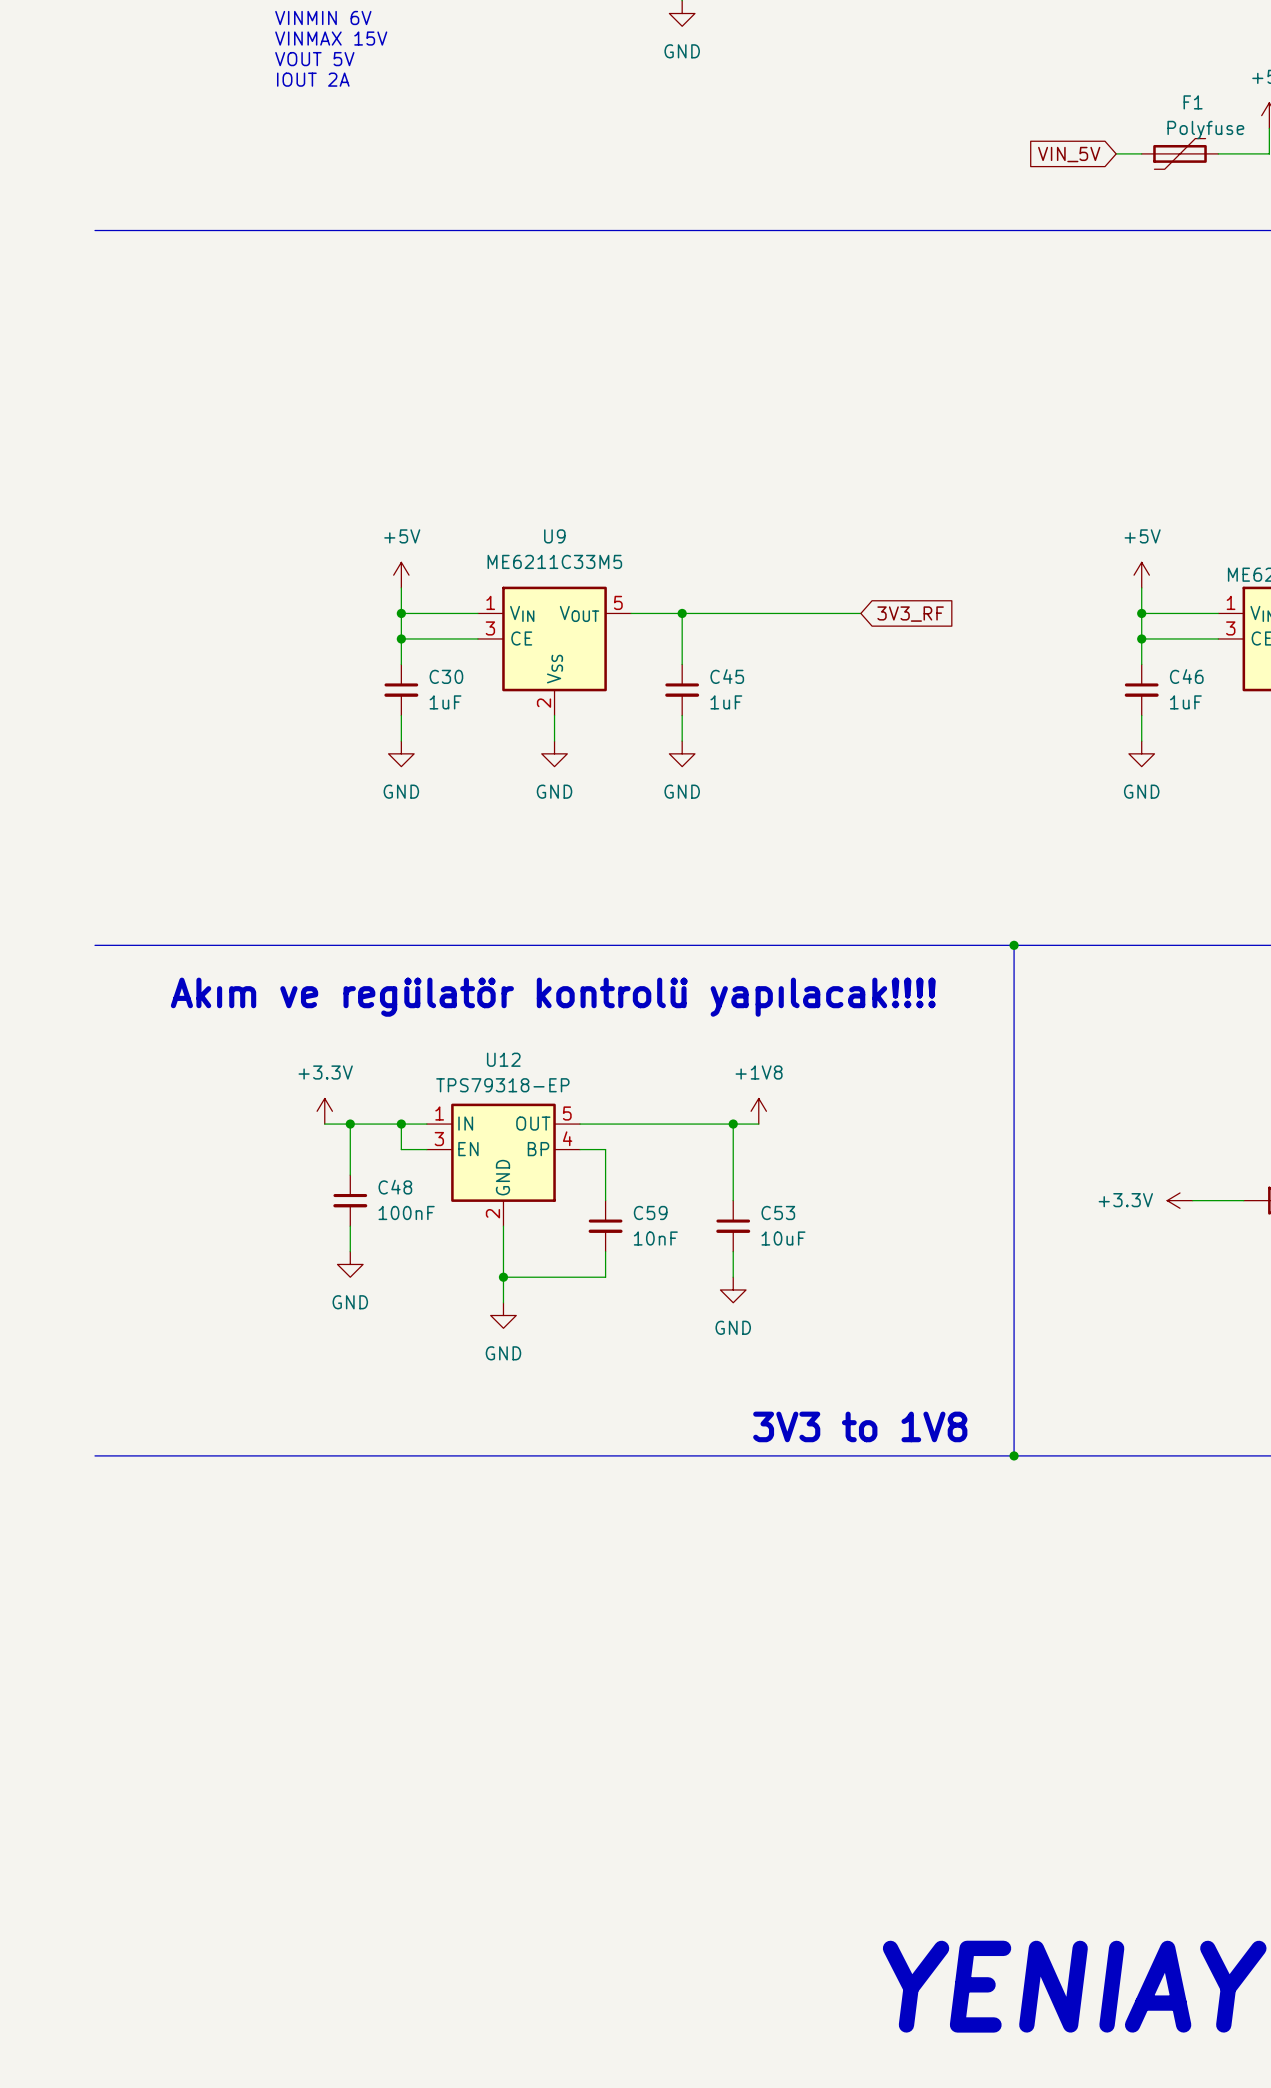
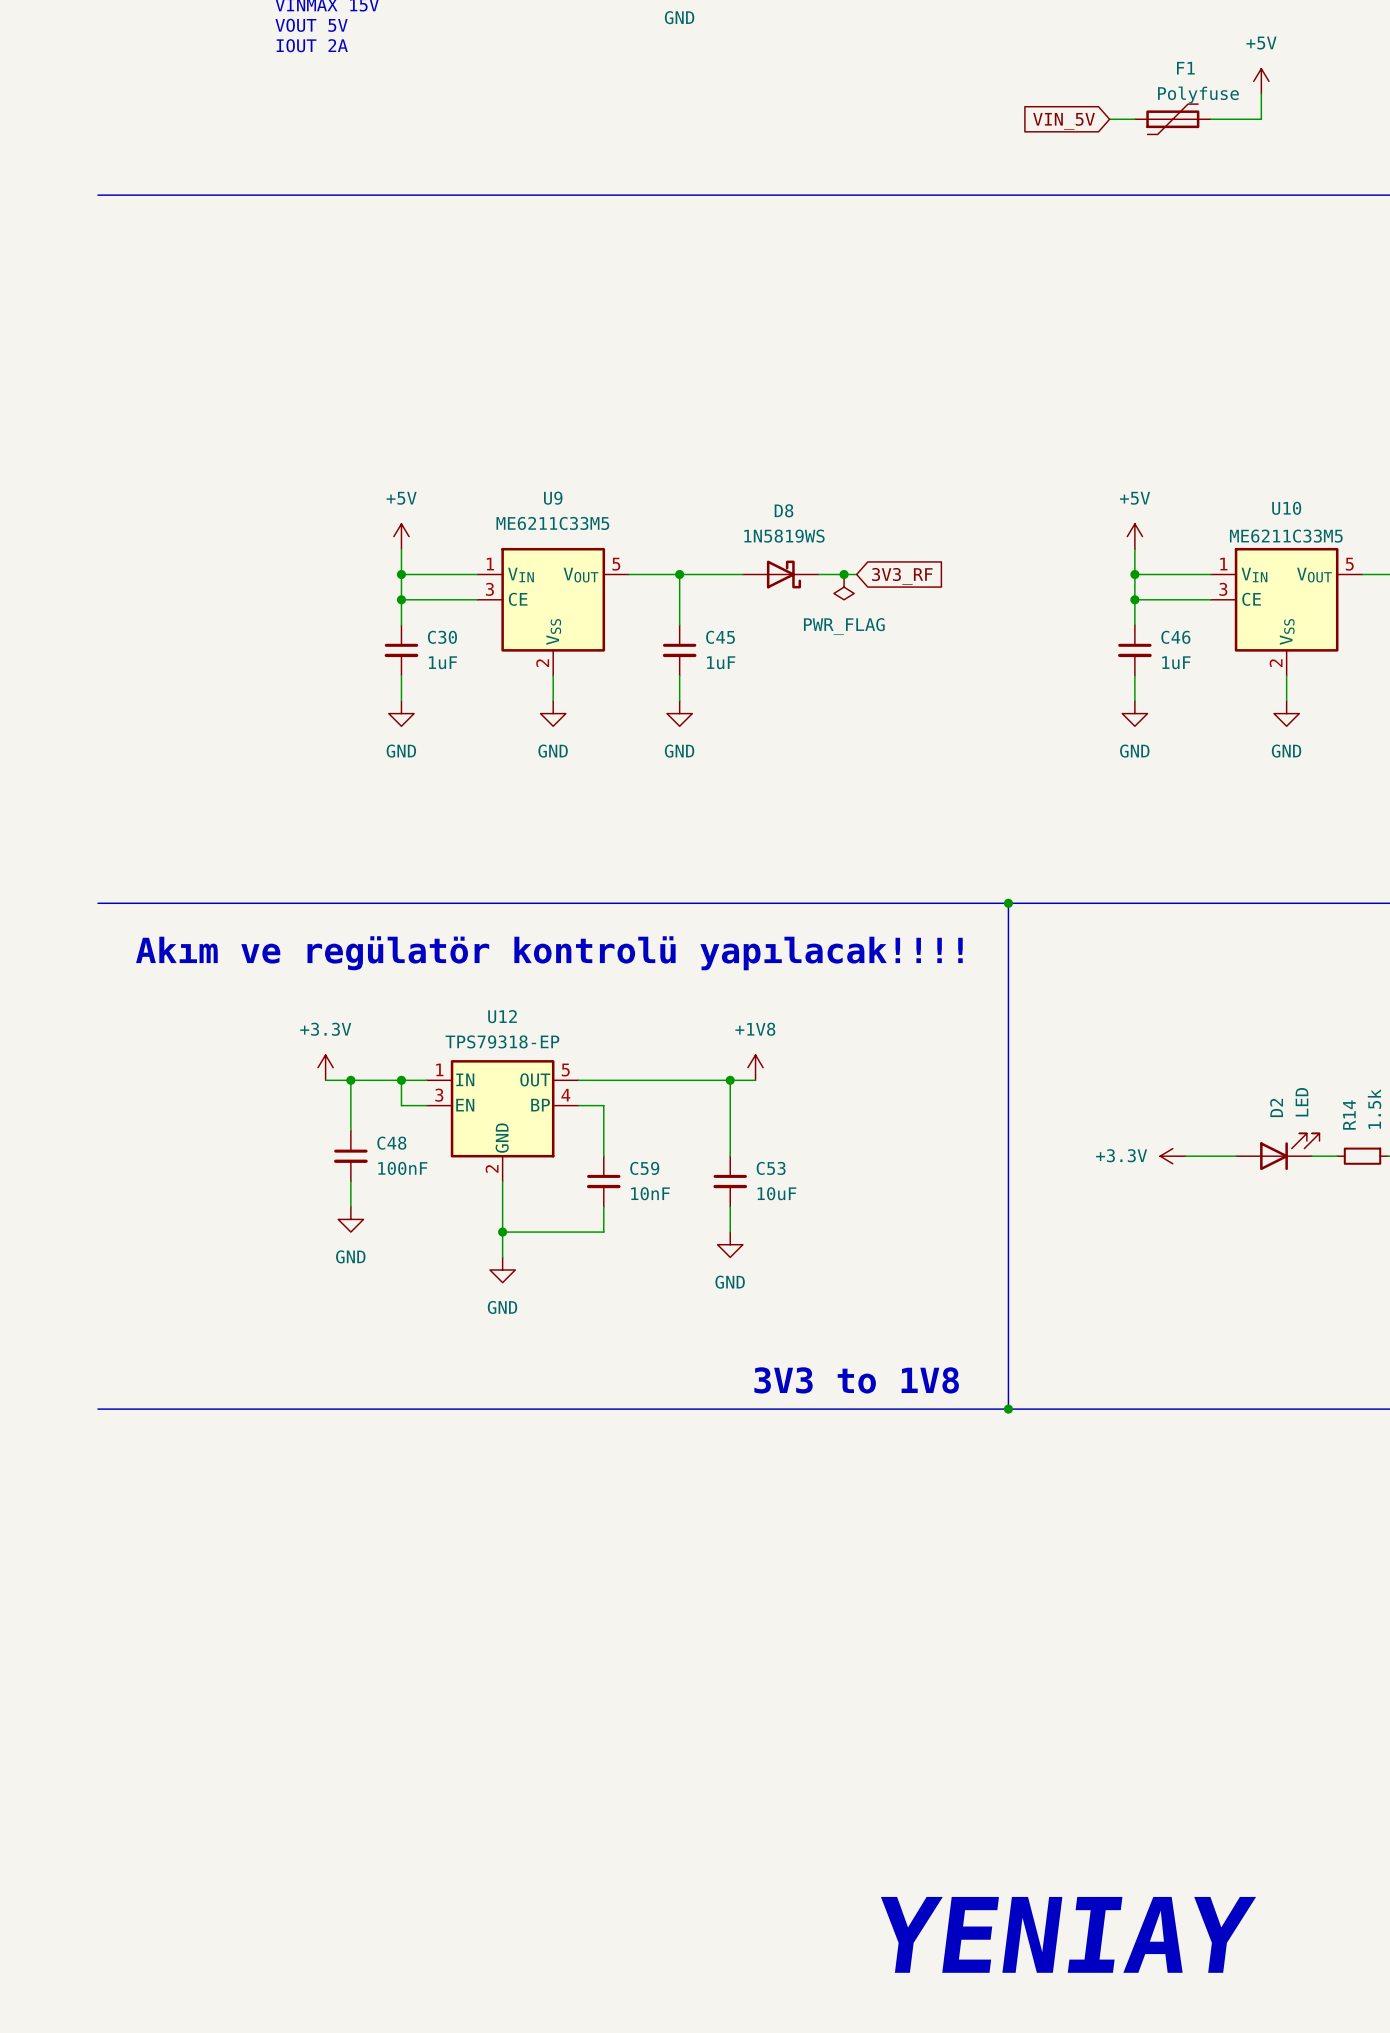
D8: none -> 1N5819WS (780, 574)
junction: none -> (844, 574)
power symbol: none -> PWR_FLAG (844, 587)

